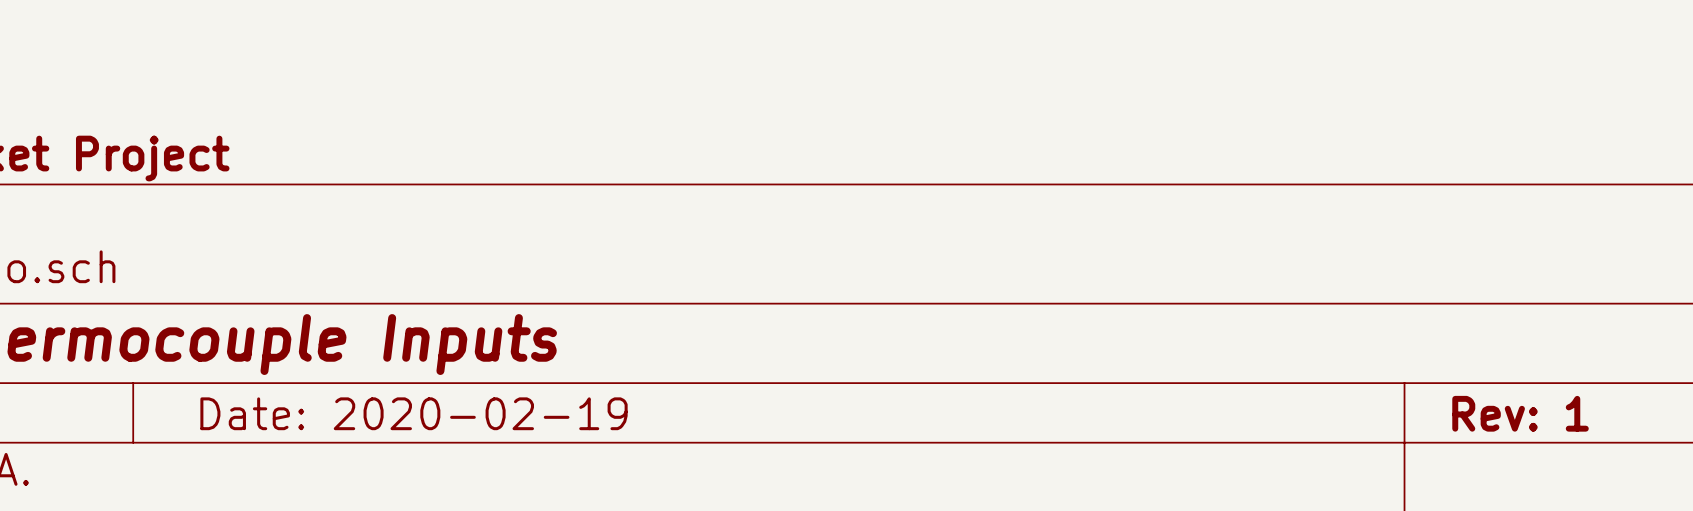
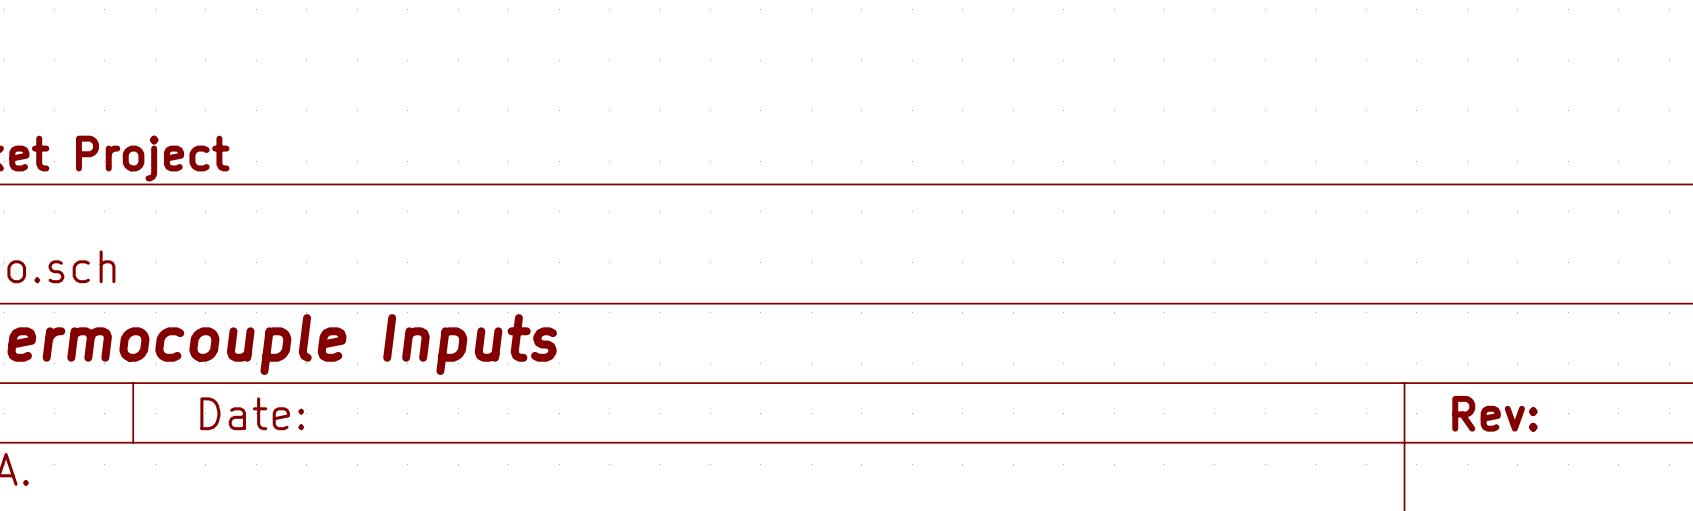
title block: Date: 2020-02-19 (414, 413) -> Date: (252, 413)
title block: Rev: 1 (1520, 413) -> Rev: (1494, 413)

